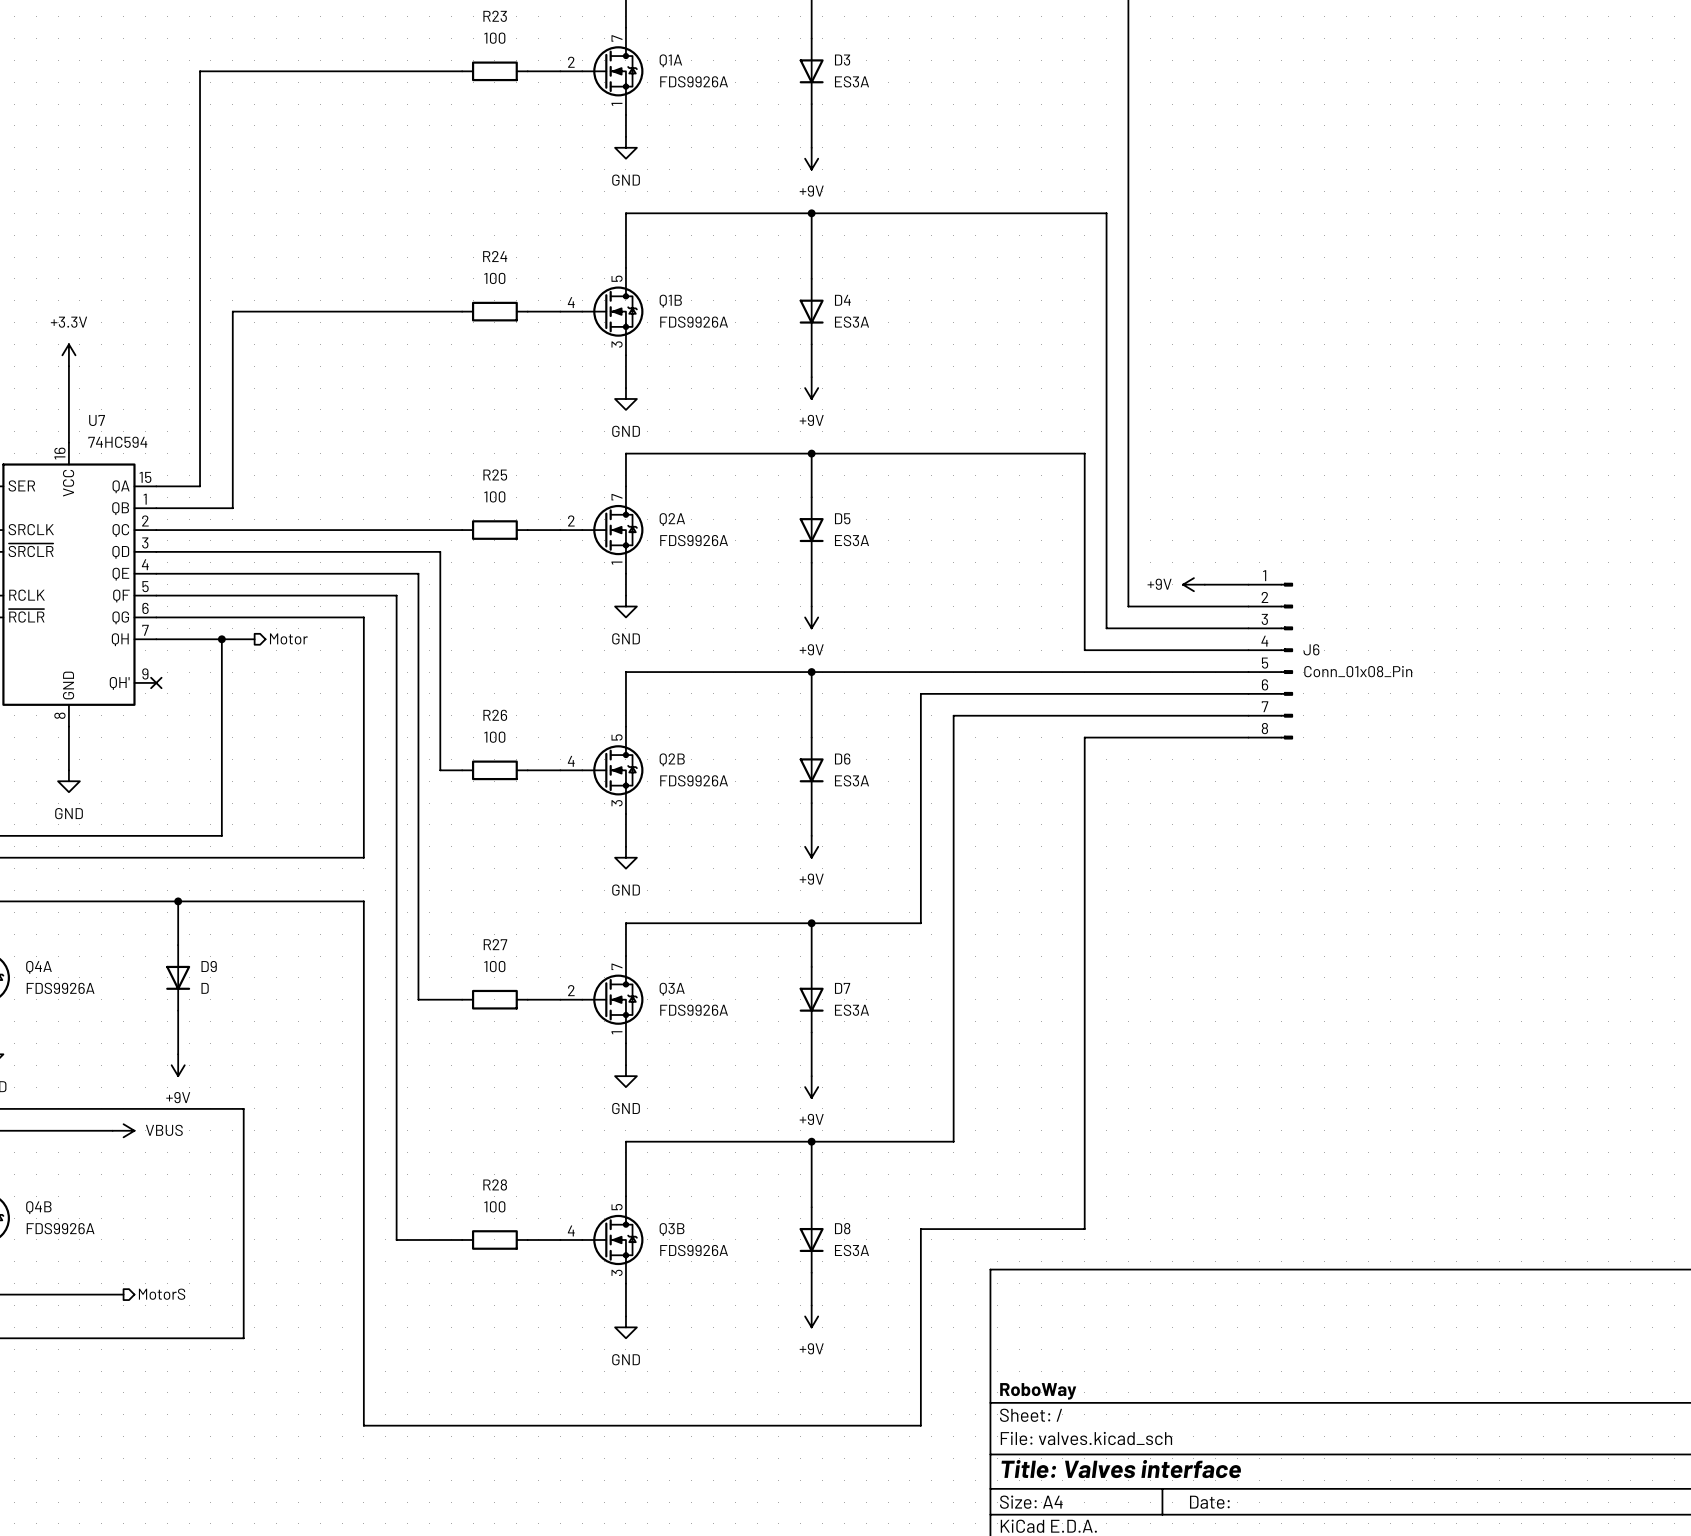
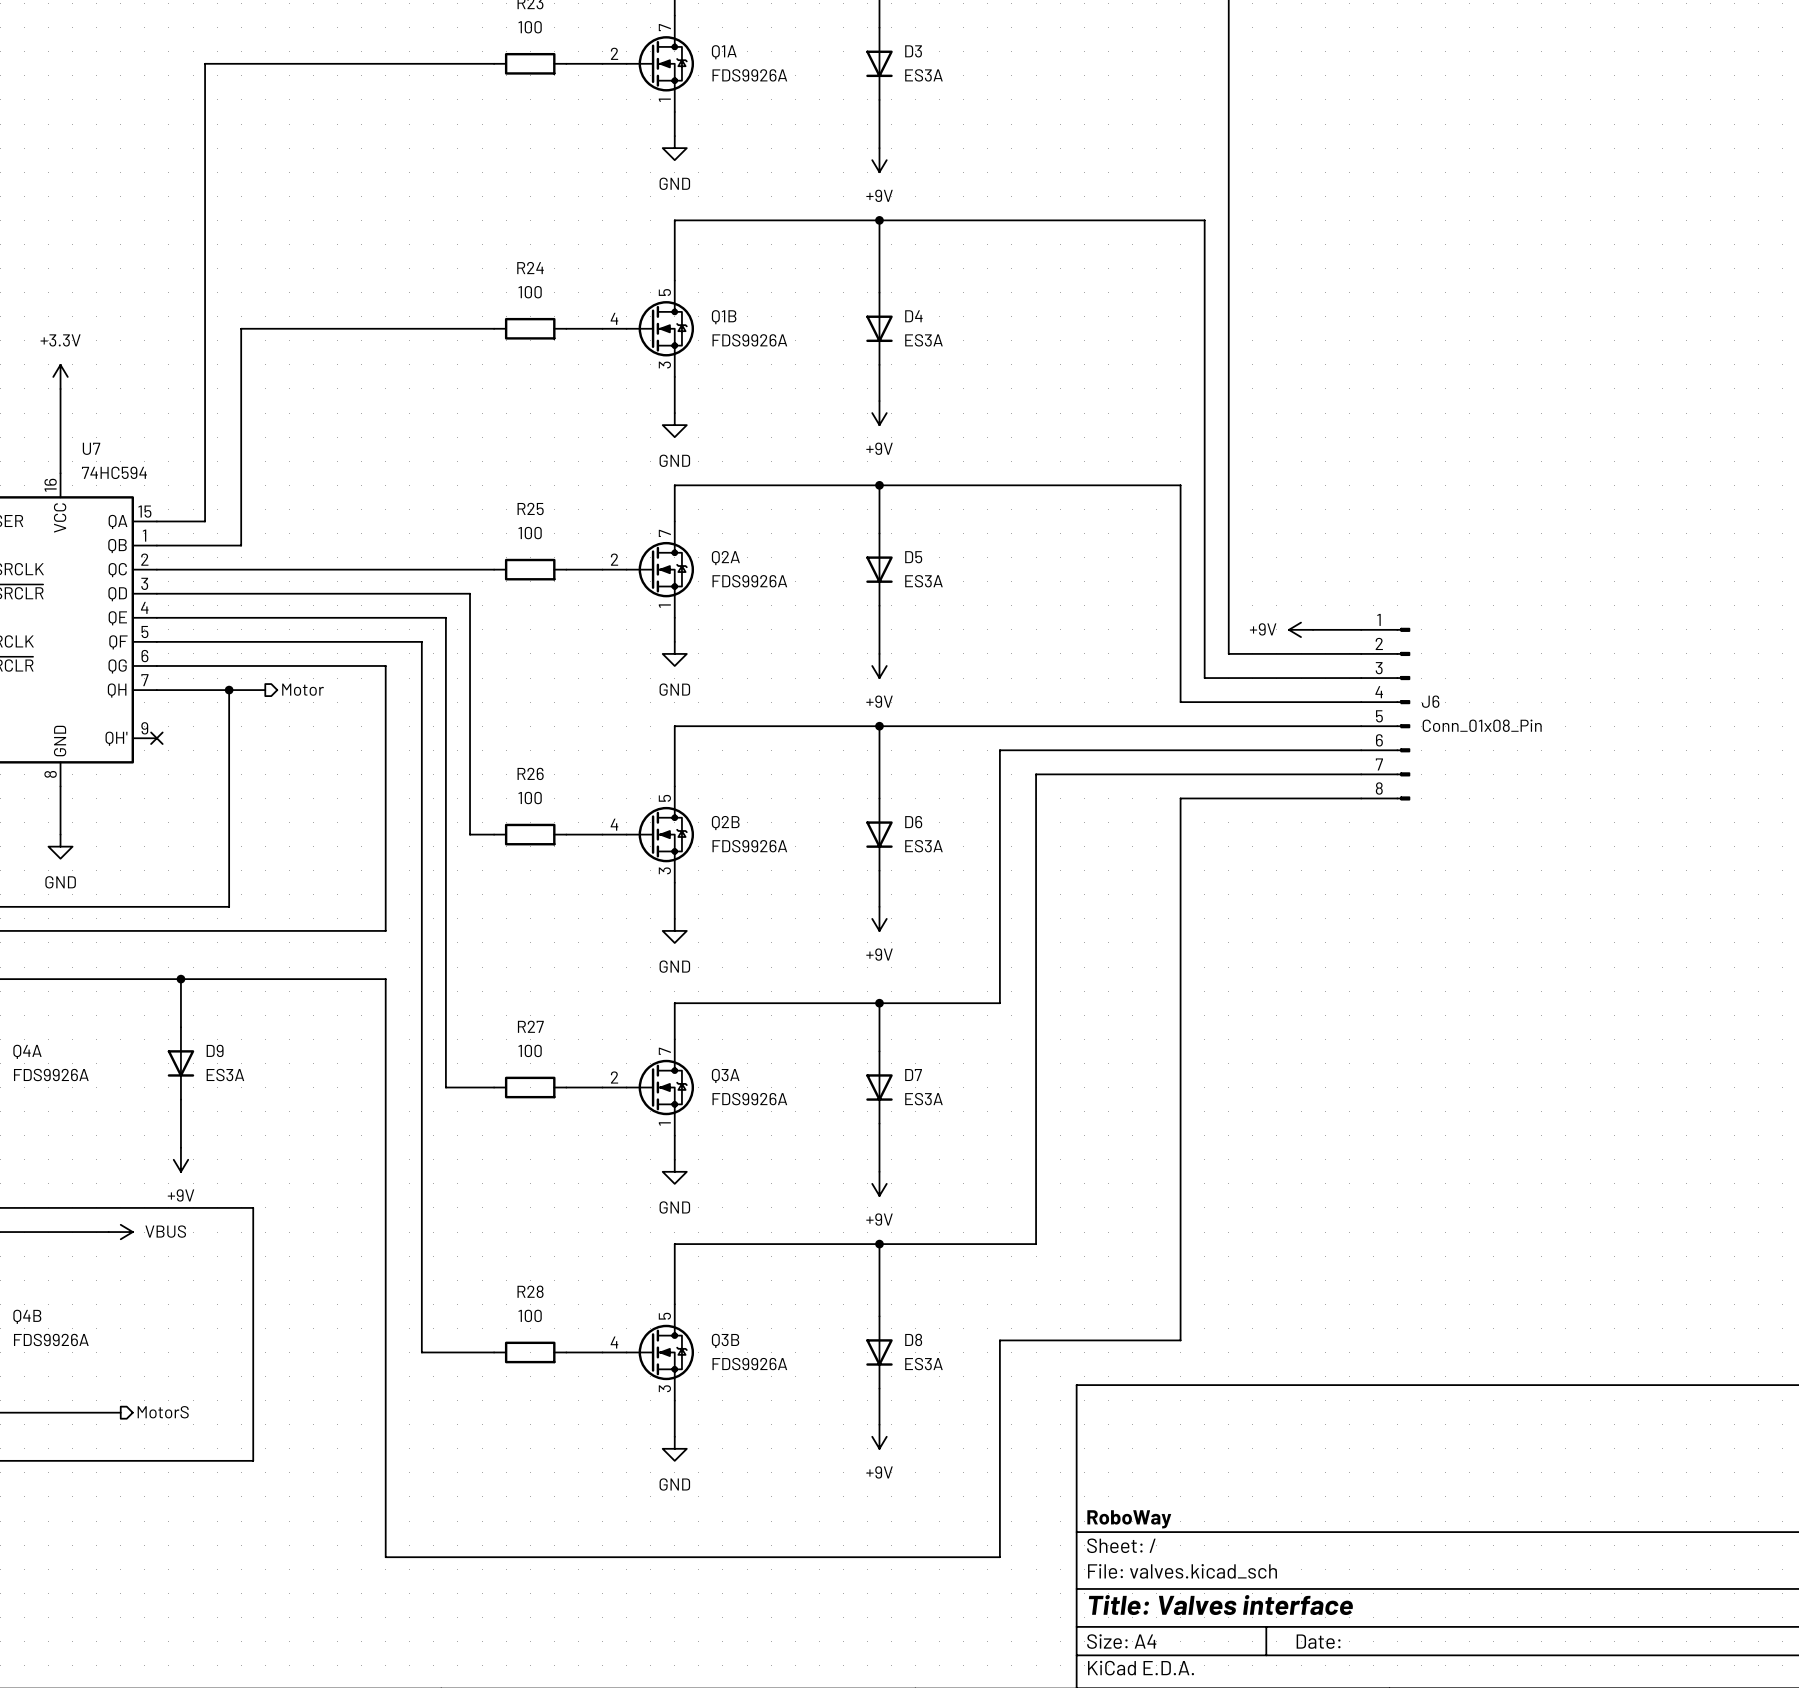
D9 value: D (205, 988) -> ES3A (225, 1075)

